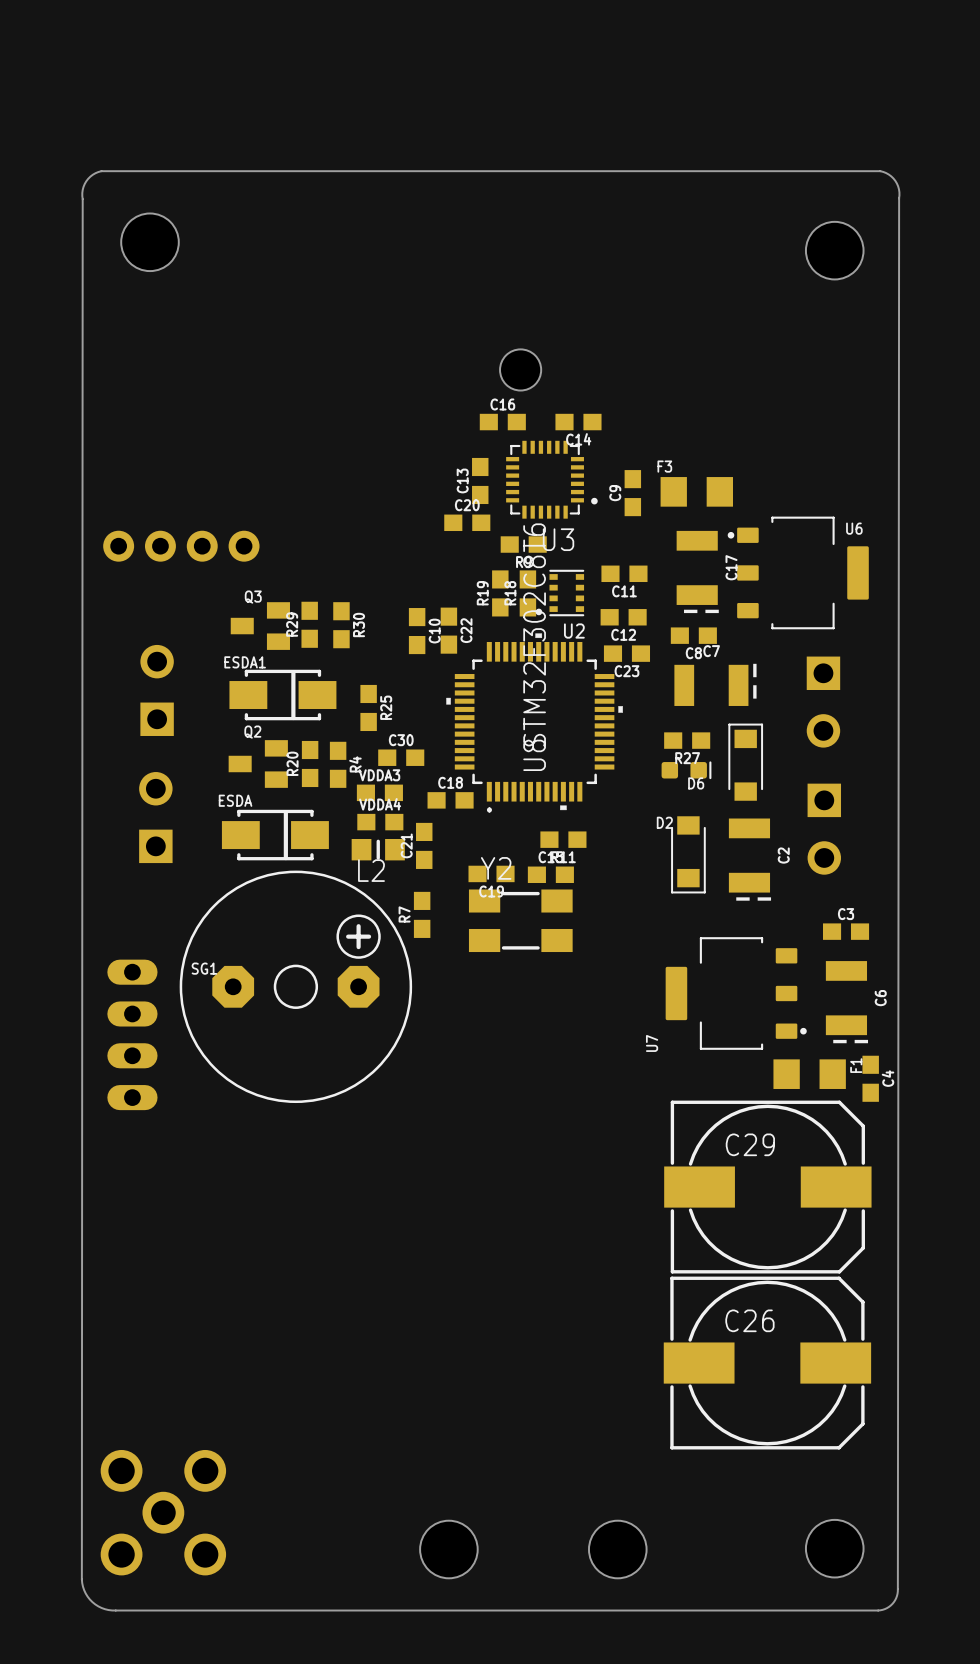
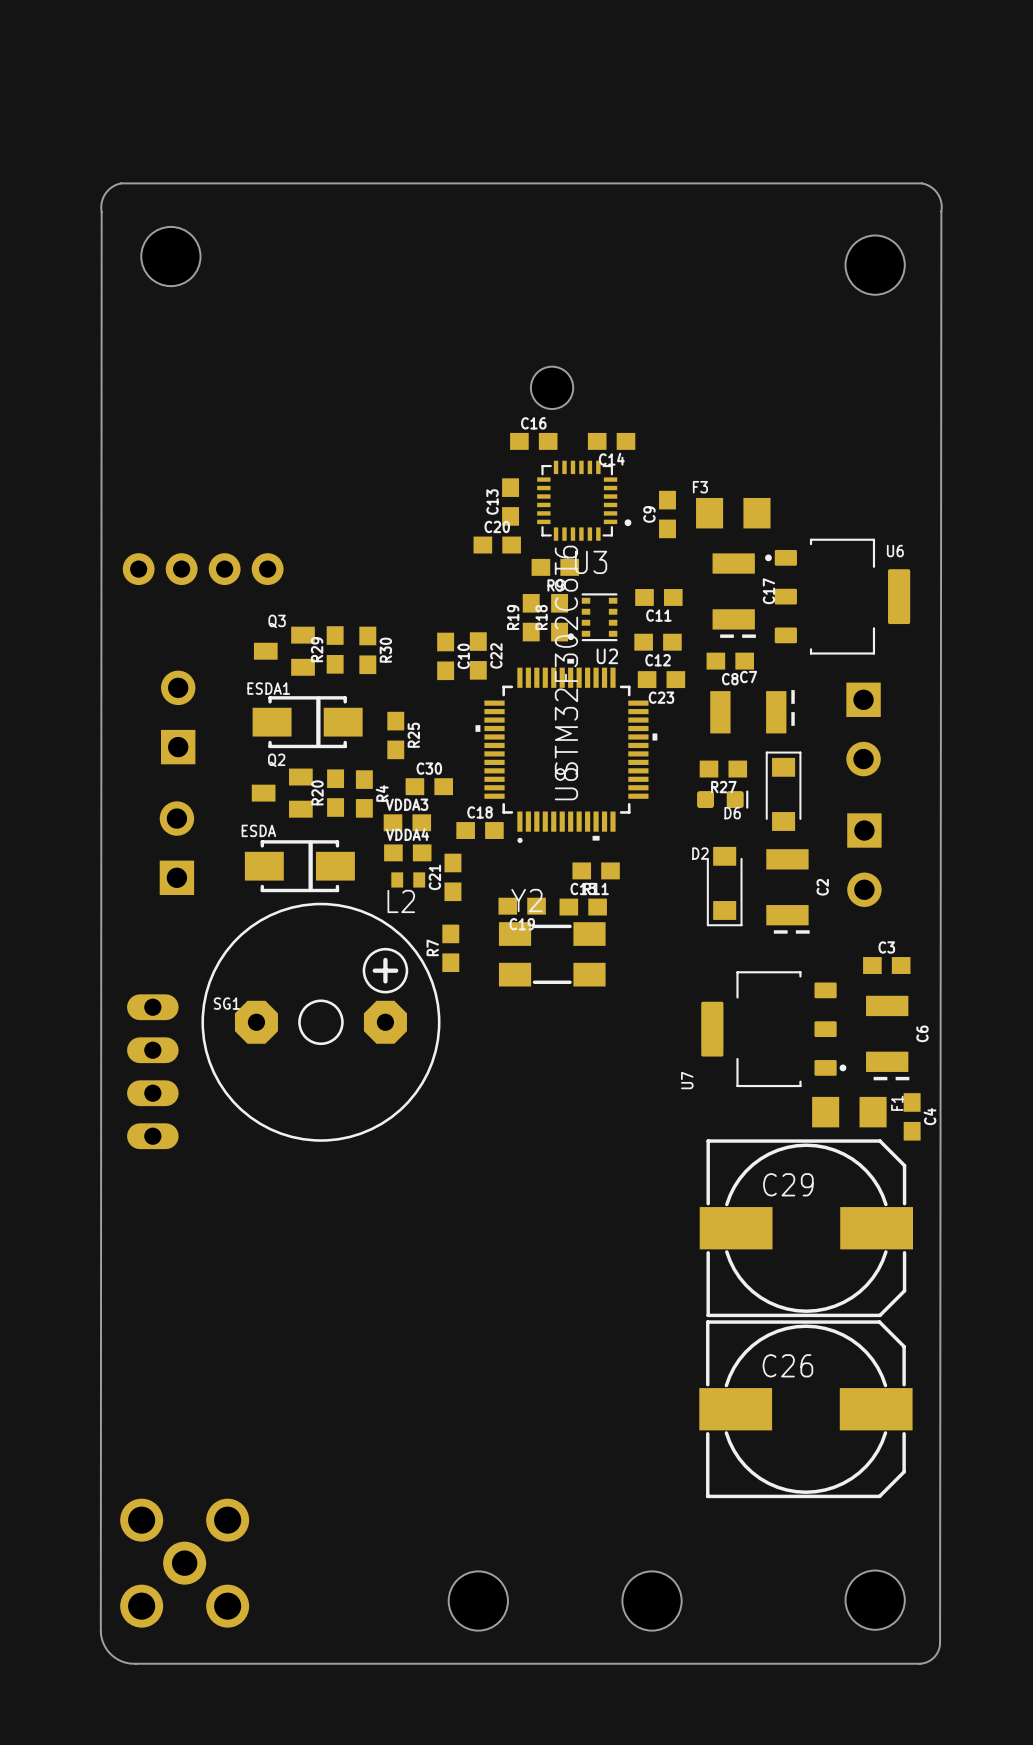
L2 footprint: [351, 838, 405, 861] -> [391, 872, 426, 888]

